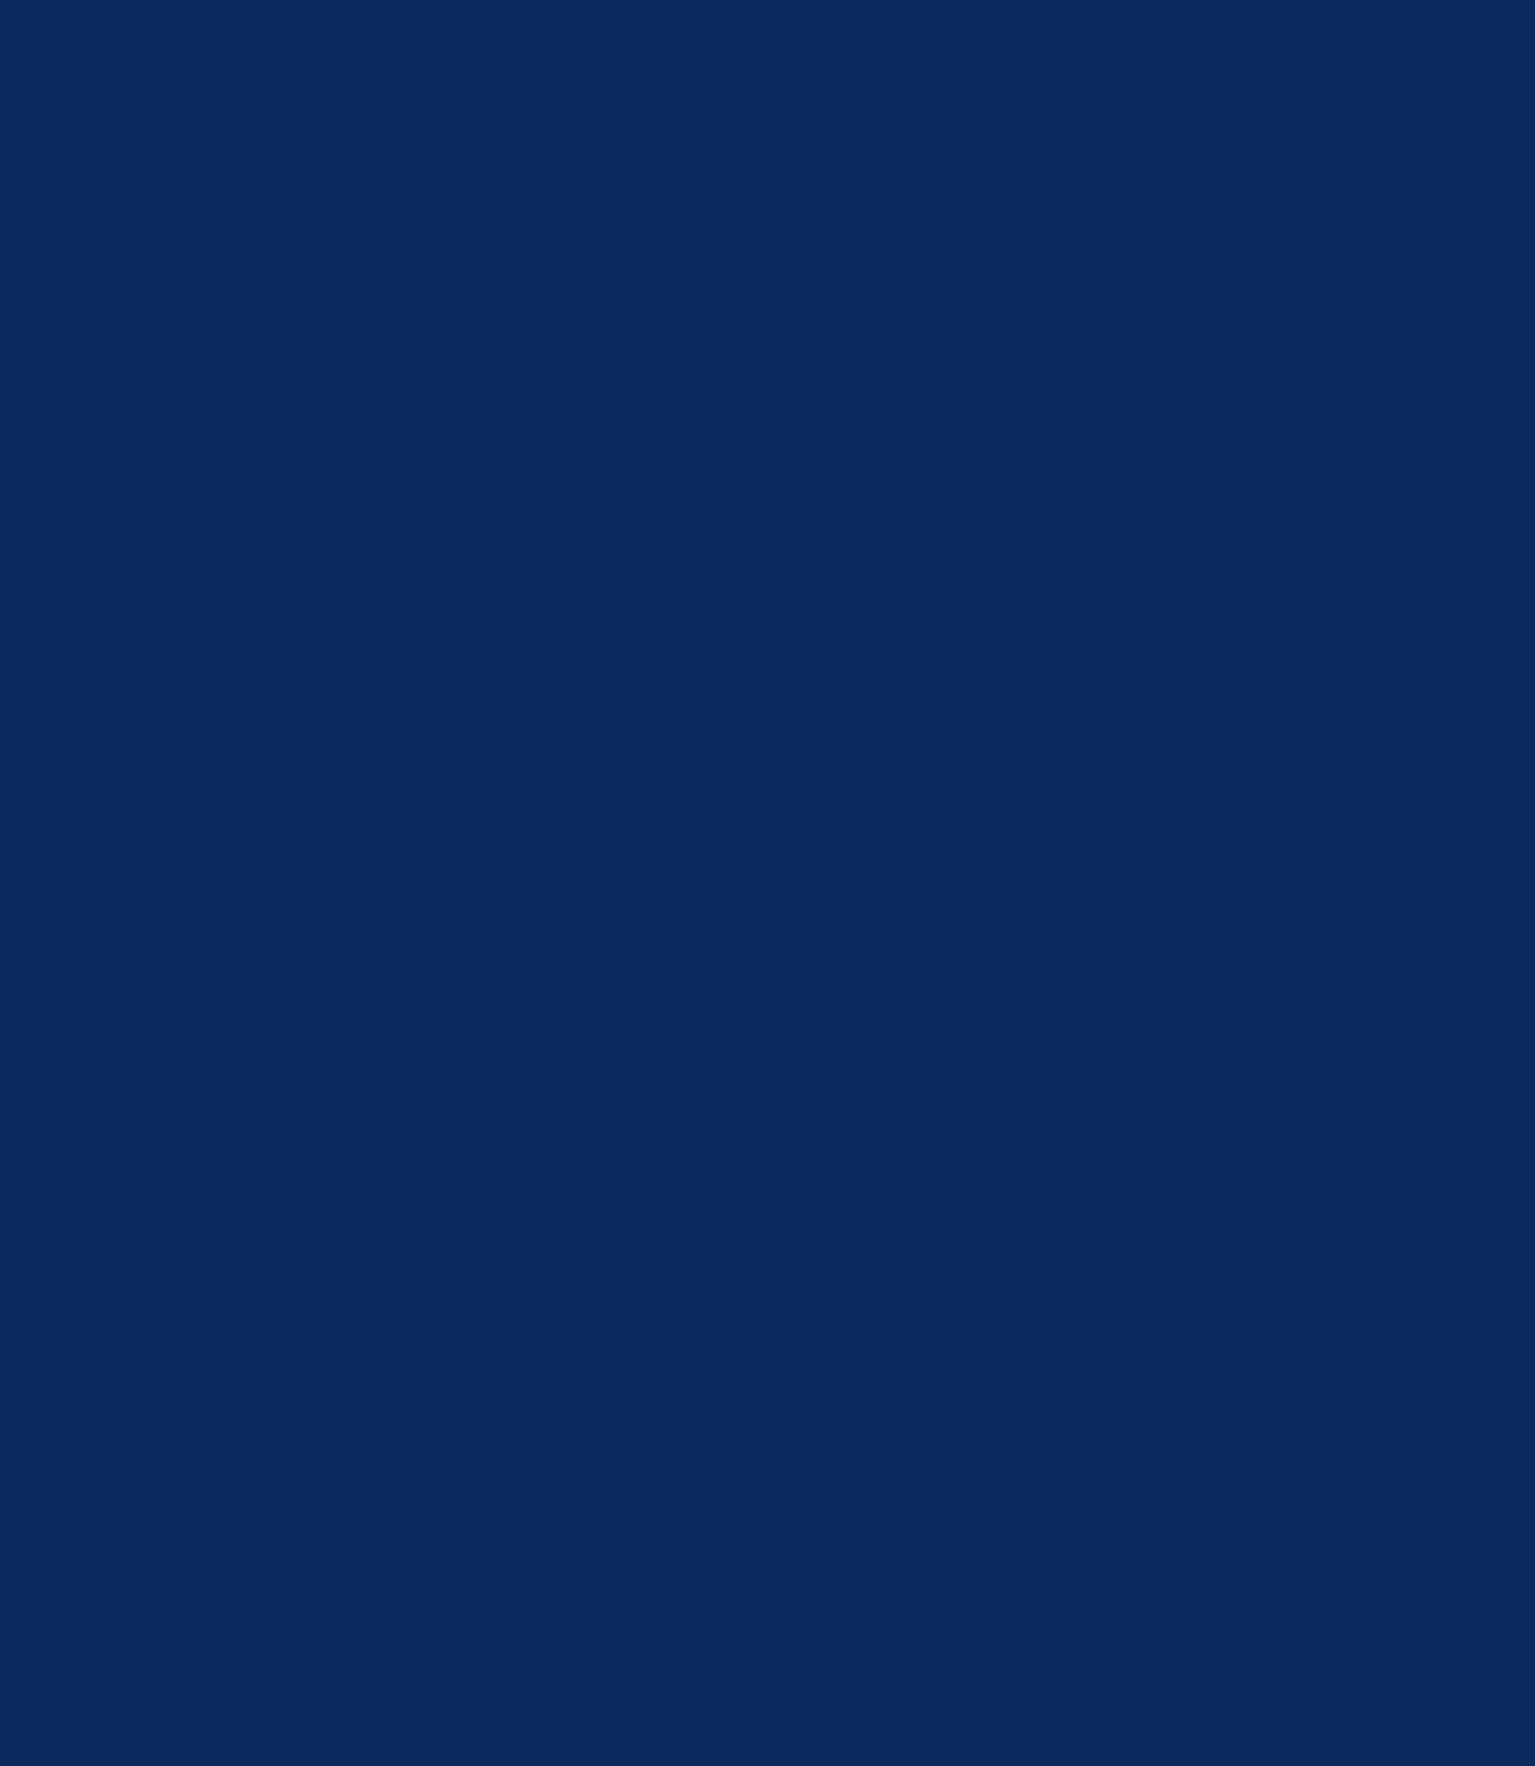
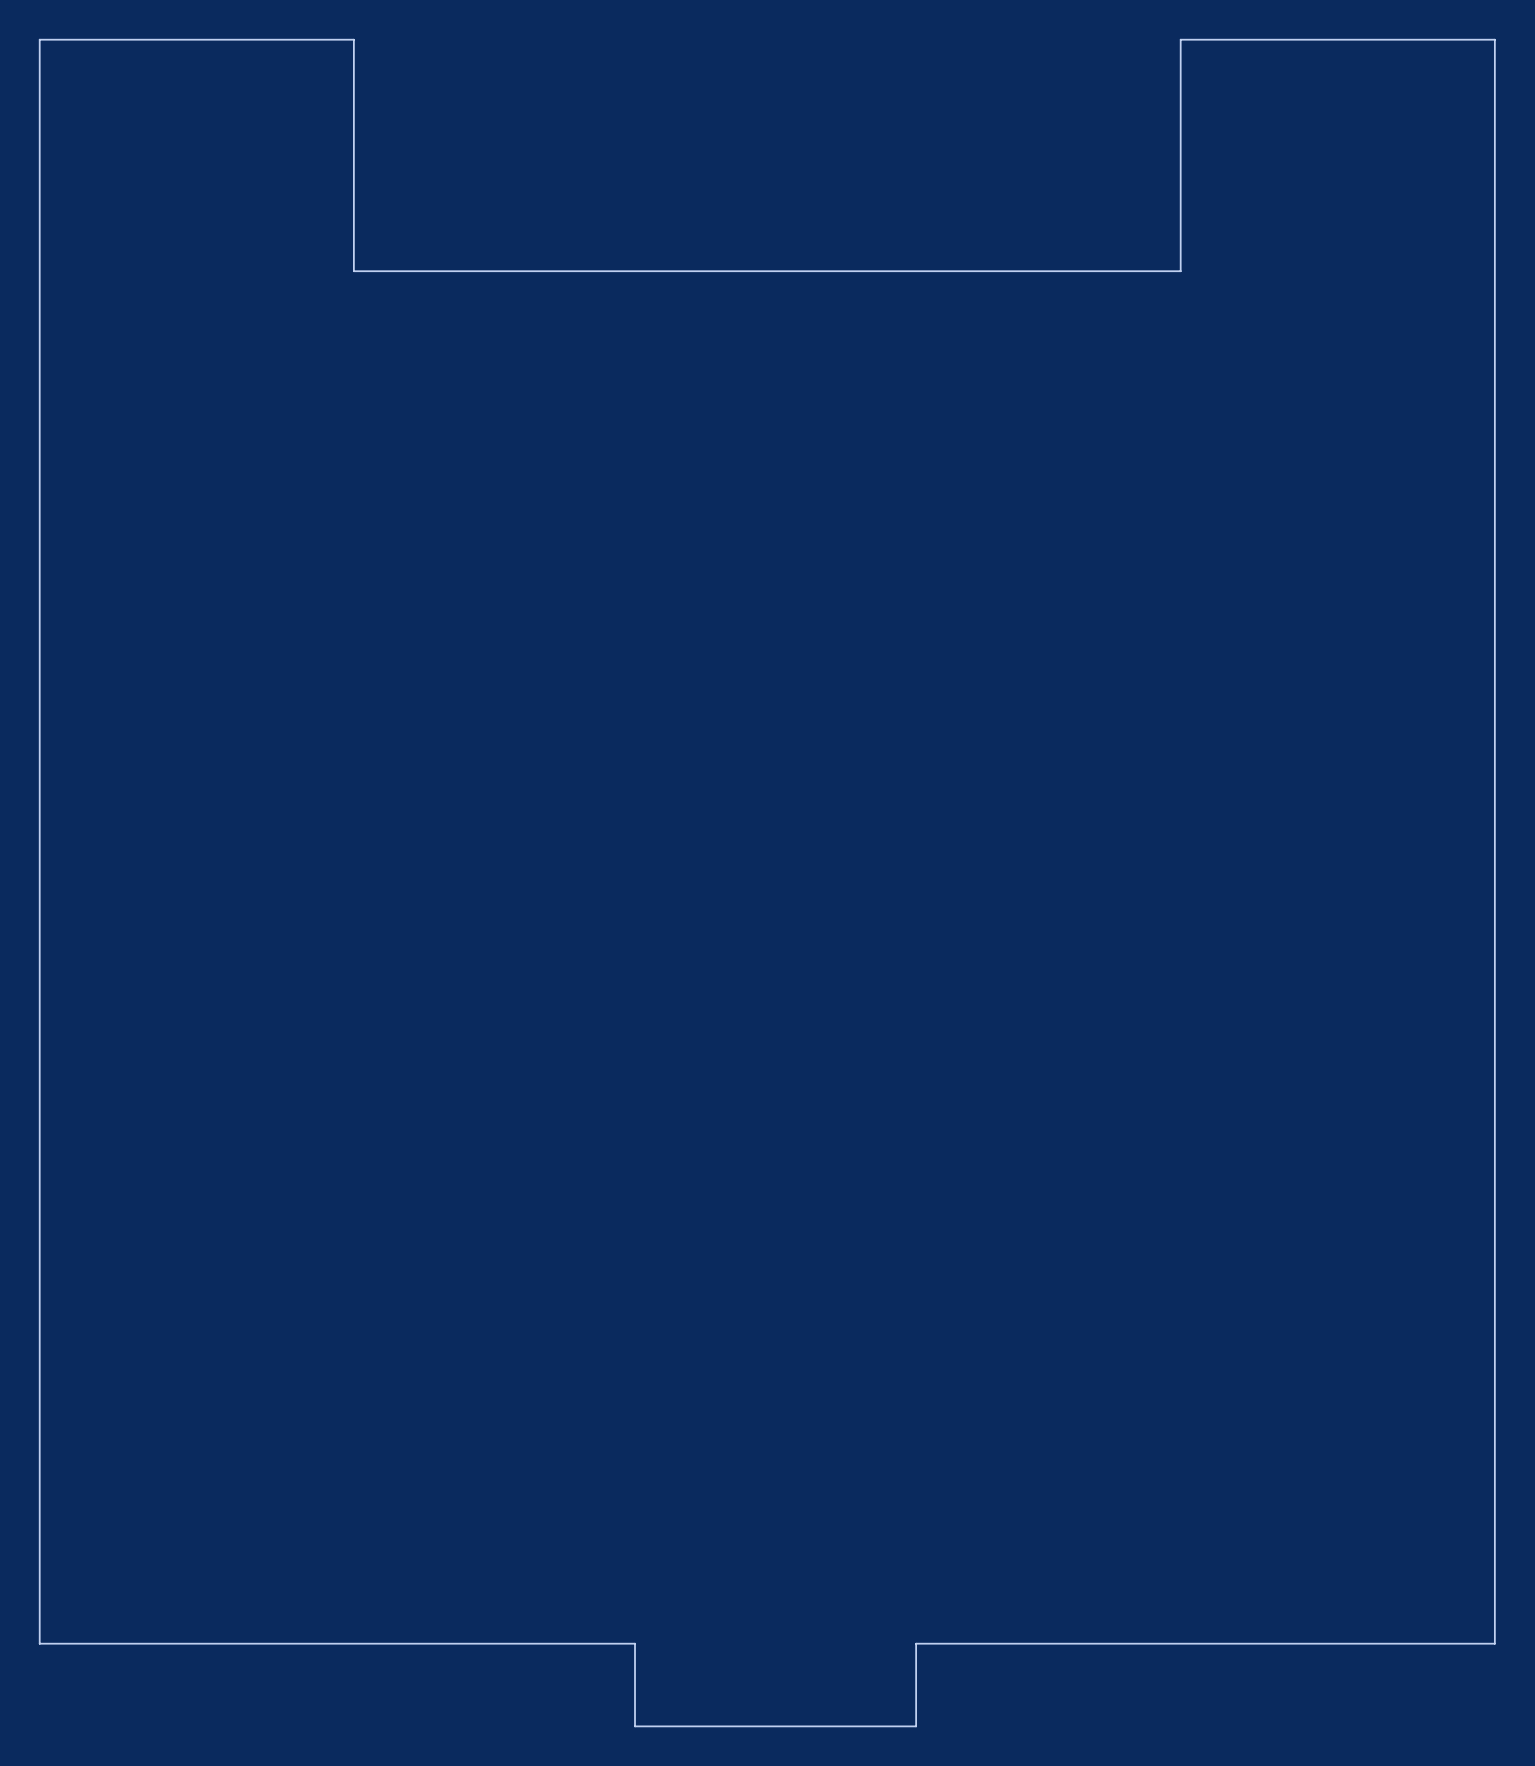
board edge: none -> (1494, 39) (1494, 1643) (916, 1643) (916, 1726) (635, 1726) (635, 1643) (39, 1643) (39, 39) (353, 39) (353, 271) (1180, 271) (1180, 39) (1494, 39)

